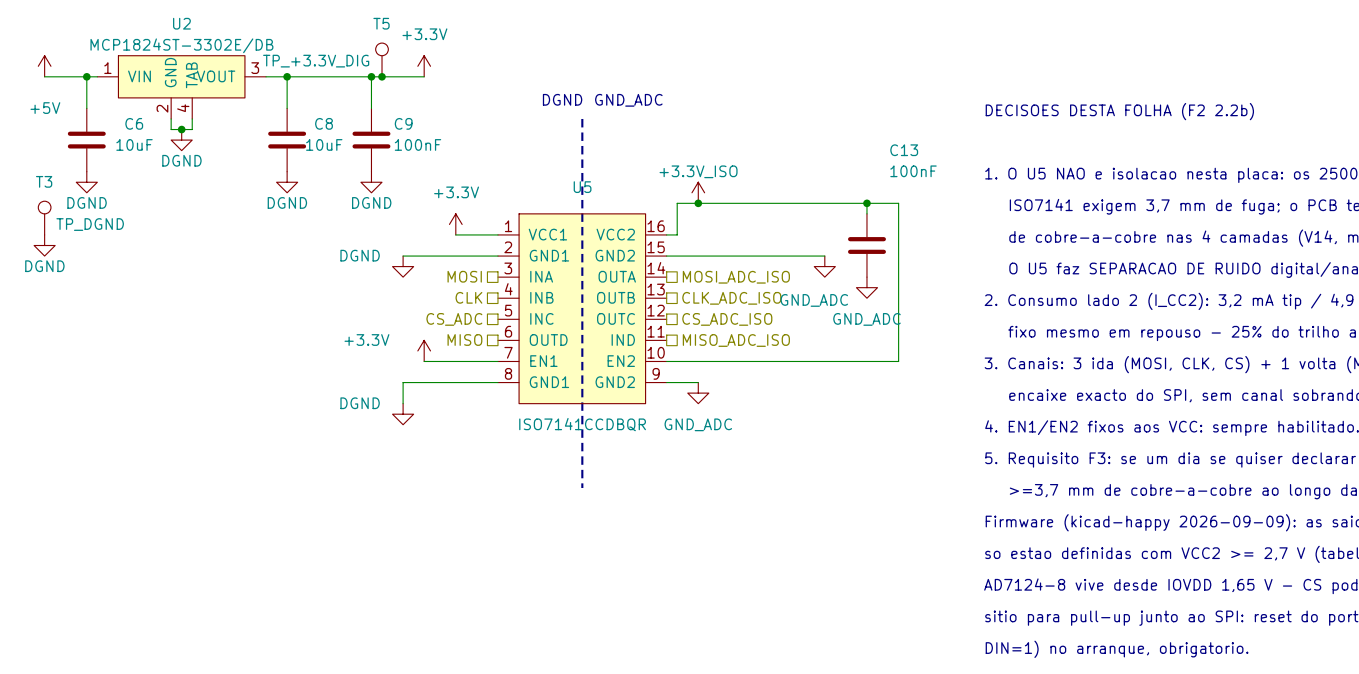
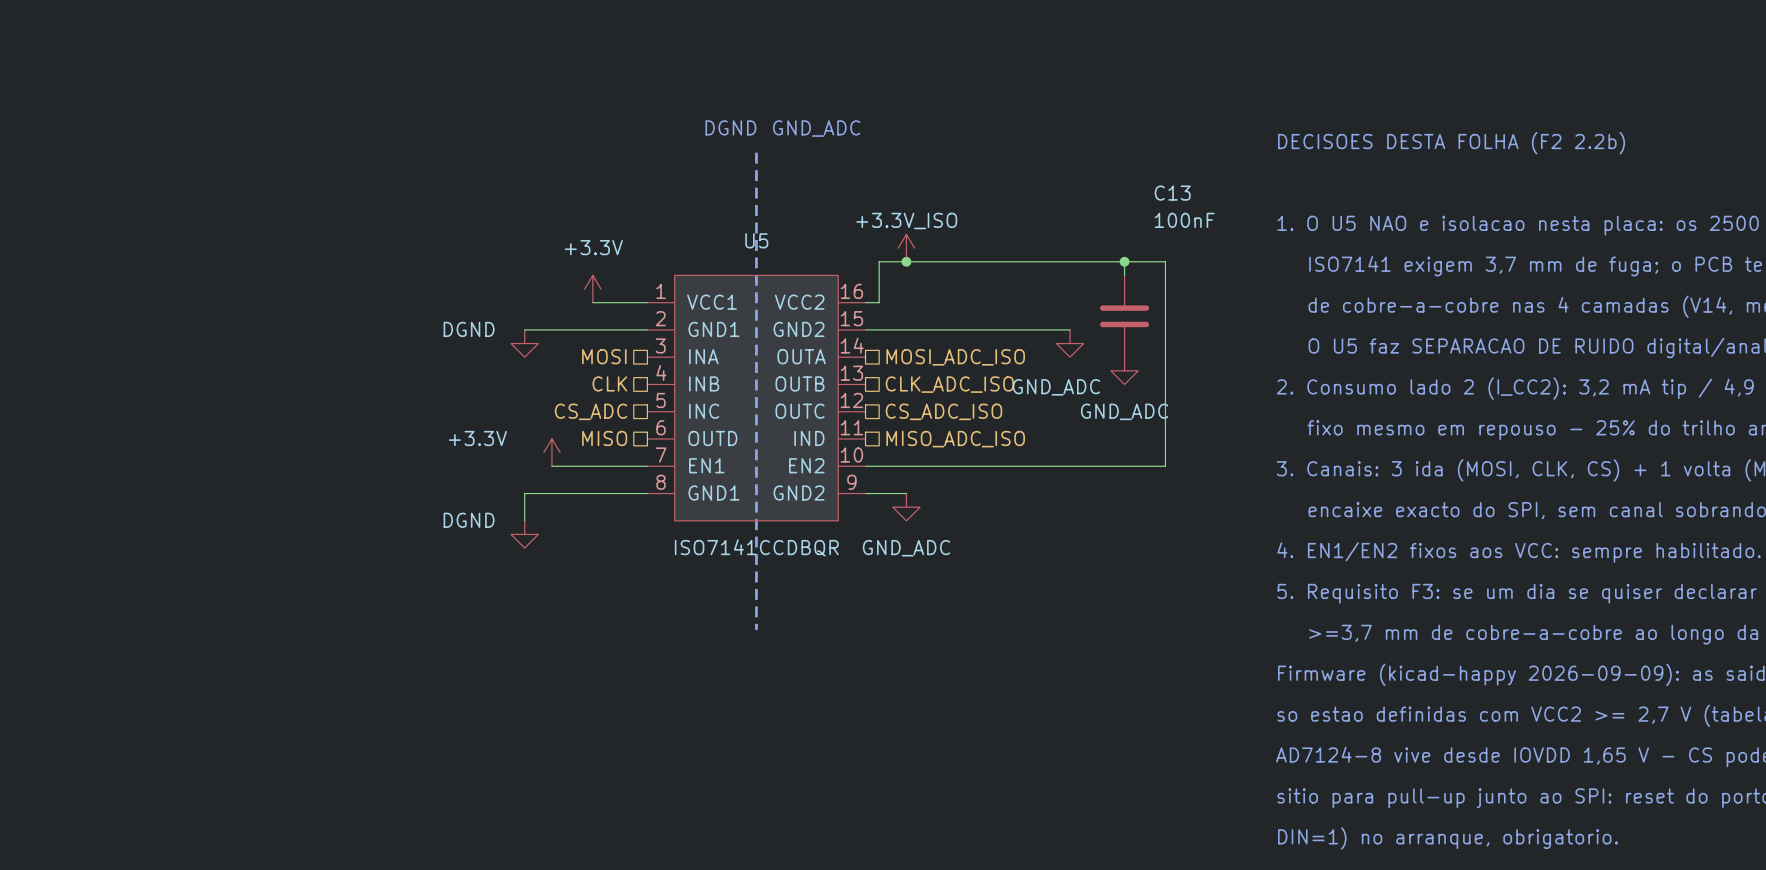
T5: TP_+3.3V_DIG (382, 59) -> none
power symbol: +5V (44, 66) -> none
power symbol: +3.3V (424, 66) -> none
wire: (44, 76) (97, 76) -> none
wire: (86, 76) (86, 108) -> none
junction: (86, 76) -> none
wire: (266, 76) (424, 76) -> none
wire: (287, 76) (287, 108) -> none
junction: (287, 76) -> none
wire: (371, 76) (371, 108) -> none
junction: (371, 76) -> none
junction: (382, 76) -> none
U2: MCP1824ST-3302E/DB (181, 87) -> none
wire: (171, 118) (171, 129) (192, 129) (192, 118) -> none
junction: (181, 129) -> none
C6: 10uF (86, 140) -> none
power symbol: DGND (181, 140) -> none
C8: 10uF (287, 140) -> none
C9: 100nF (371, 140) -> none
power symbol: DGND (86, 182) -> none
power symbol: DGND (287, 182) -> none
power symbol: DGND (371, 182) -> none
T3: TP_DGND (44, 218) -> none
power symbol: DGND (44, 245) -> none

